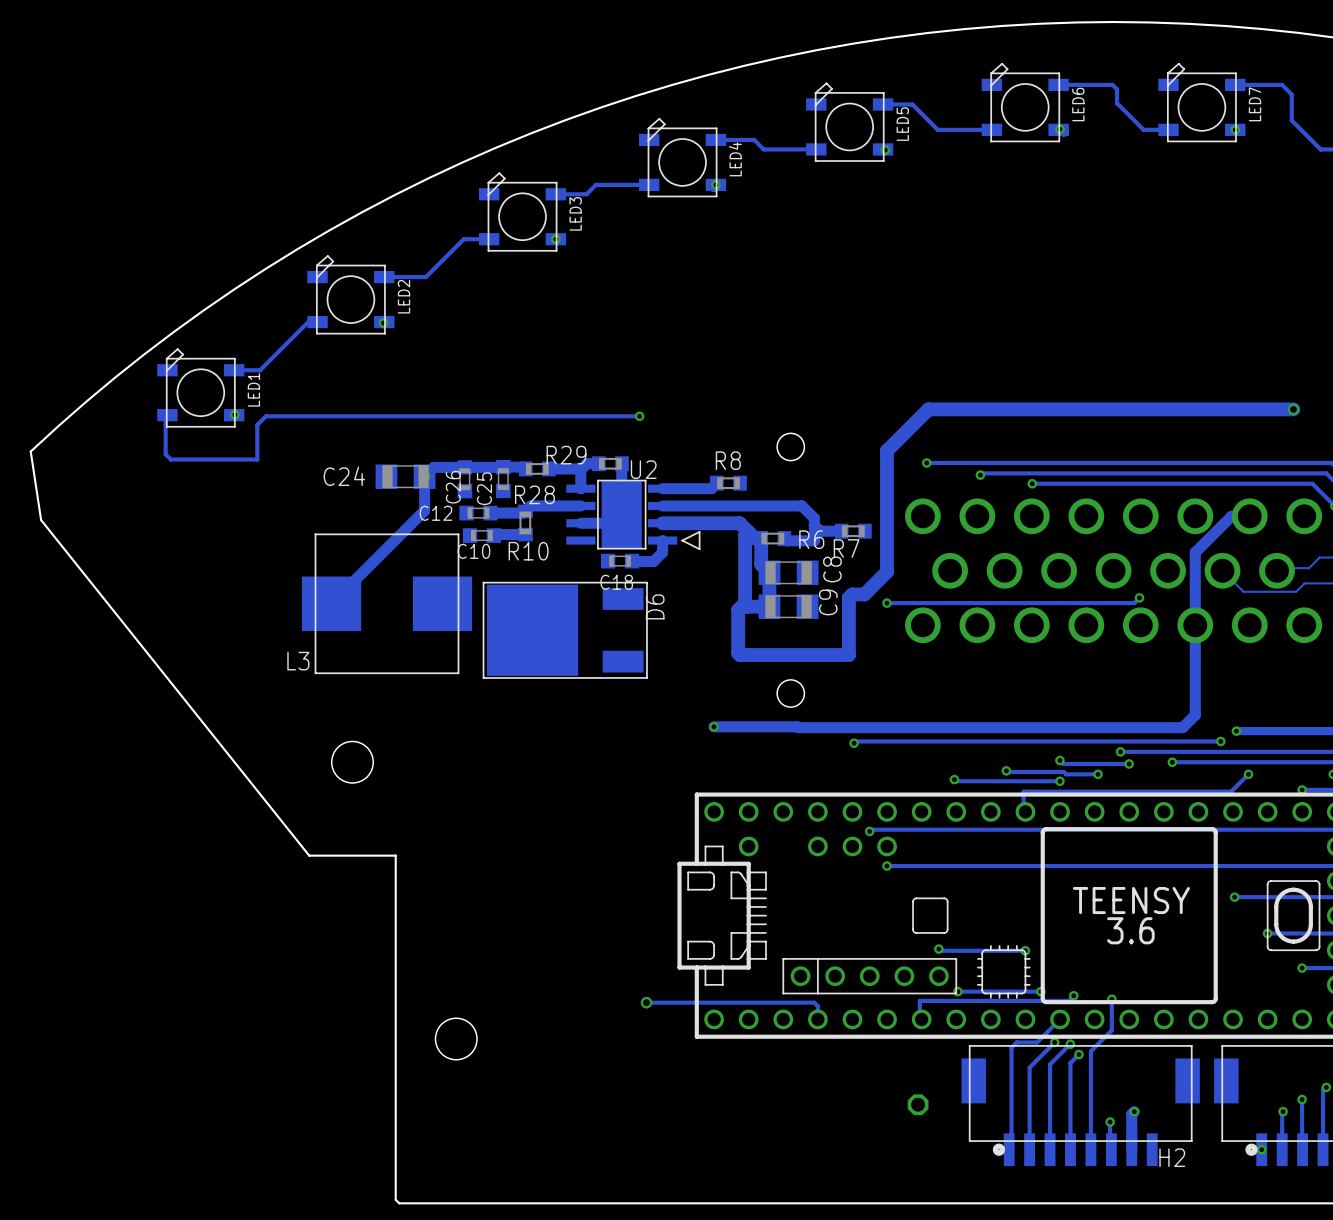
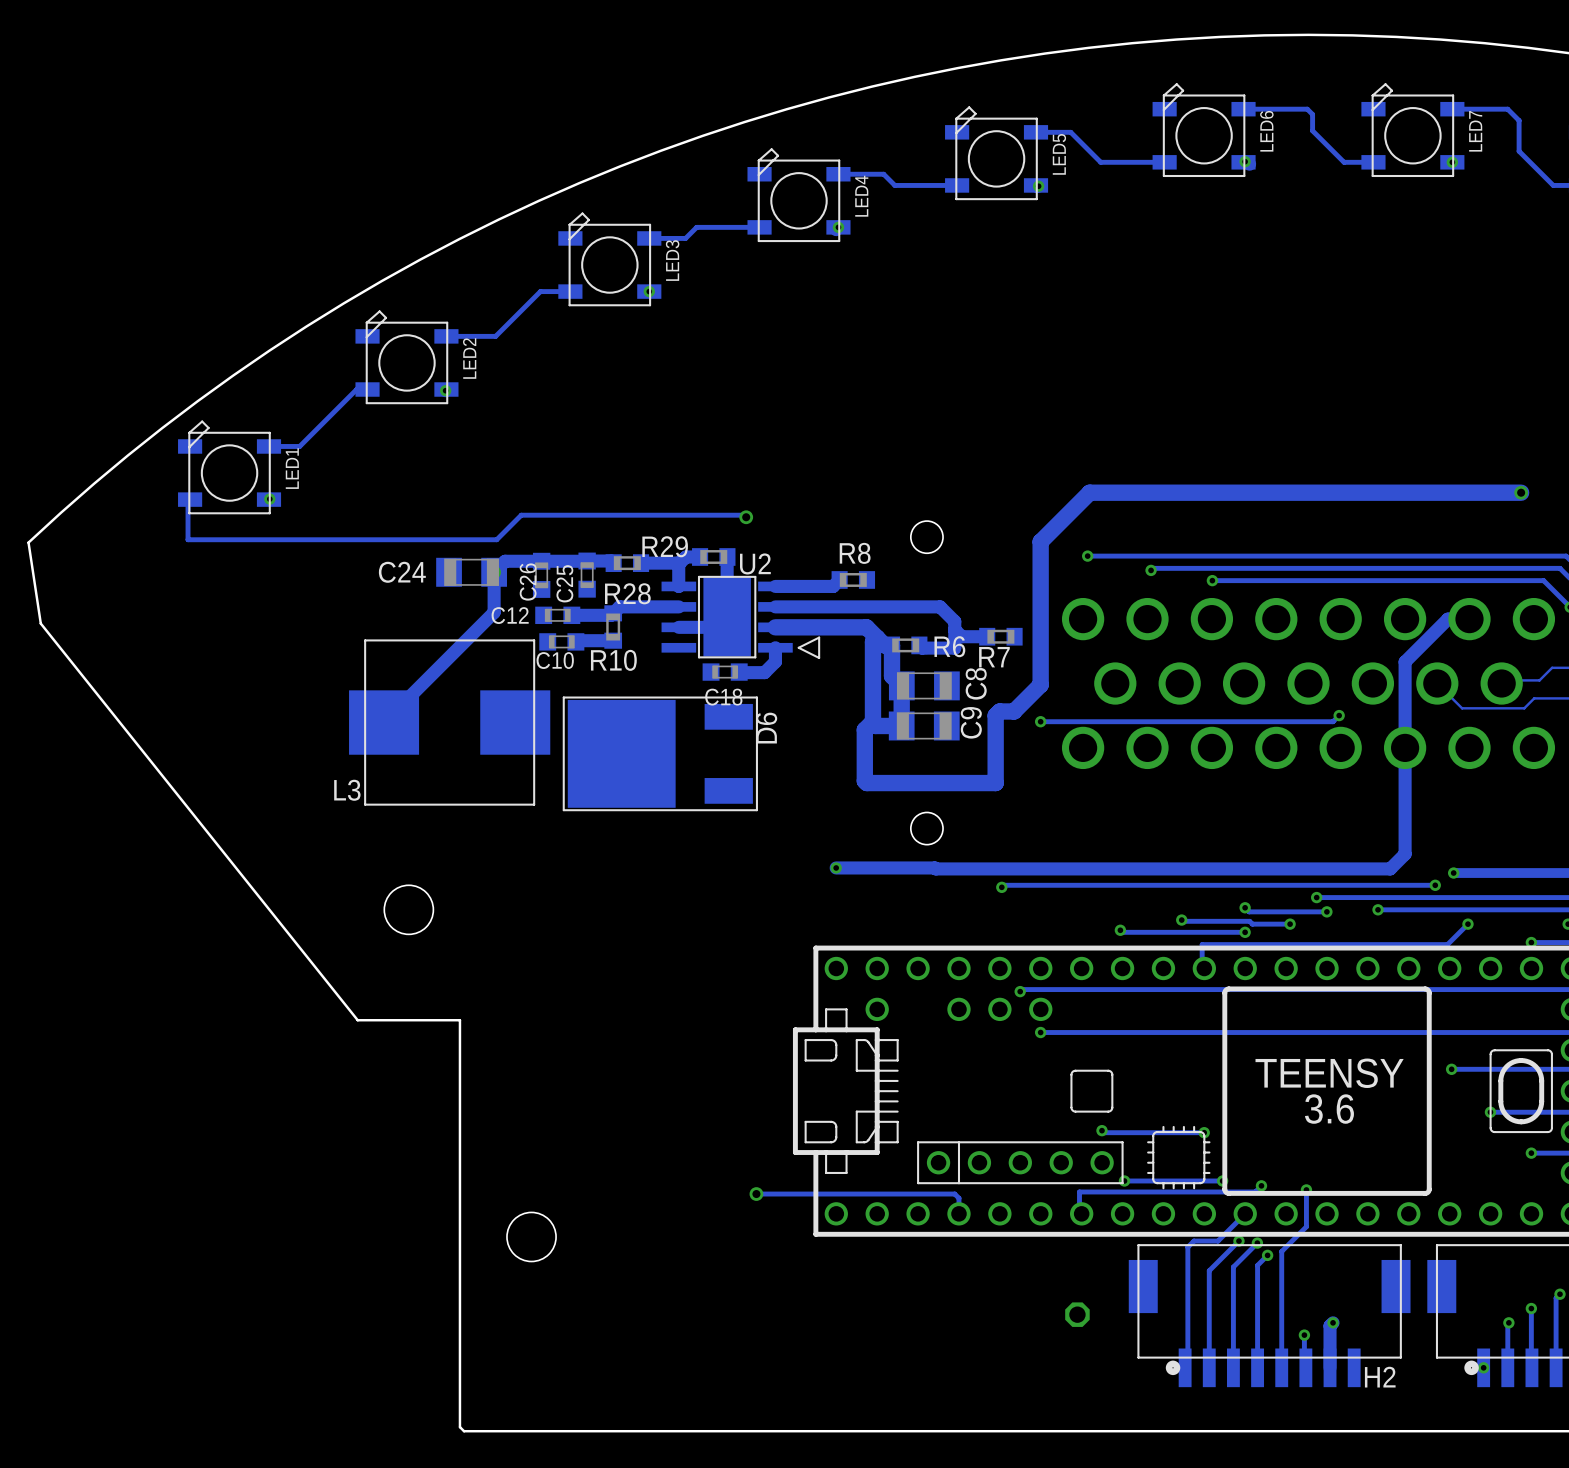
track: (639, 416) (265, 416) (257, 424) (257, 459) (170, 459) (165, 454) (165, 449) -> (746, 517) (744, 515) (521, 515) (496, 539) (188, 539)
via: (639, 416) -> none
via: none -> (746, 517)

